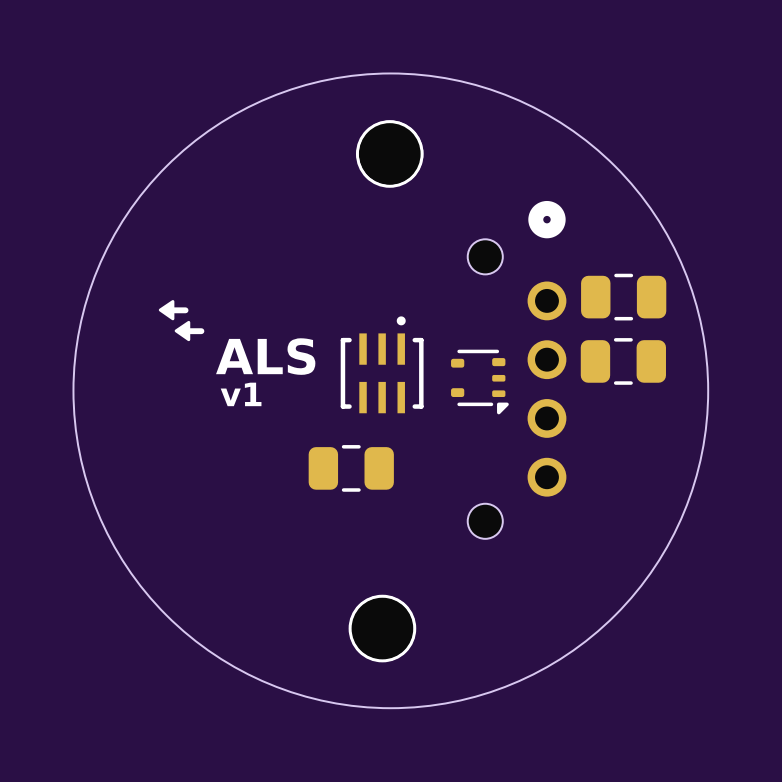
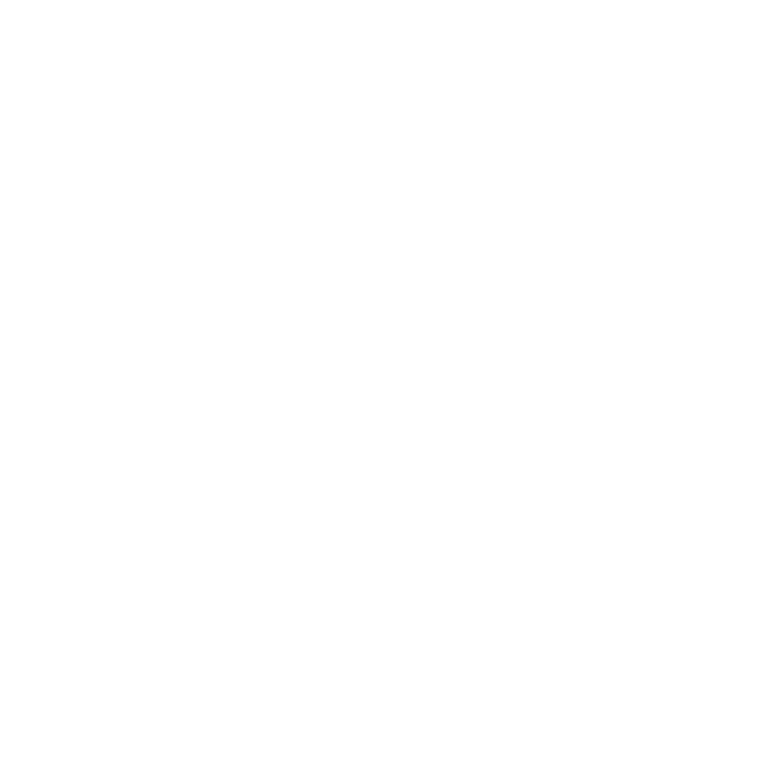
round board edge: [72, 72, 709, 709] -> none
drawing: [355, 120, 424, 188] -> none
part: (390, 153) -> none
part: (623, 297) -> none
drawing: [158, 300, 191, 342] -> none
line: (173, 310) (185, 310) -> none
line: (189, 331) (201, 331) -> none
text: ALS (265, 356) -> none
part: (623, 361) -> none
part: (382, 364) -> none
part: (517, 369) -> none
part: (479, 382) -> none
text: v1 (241, 394) -> none
part: (351, 468) -> none
drawing: [348, 594, 417, 663] -> none
part: (382, 628) -> none

